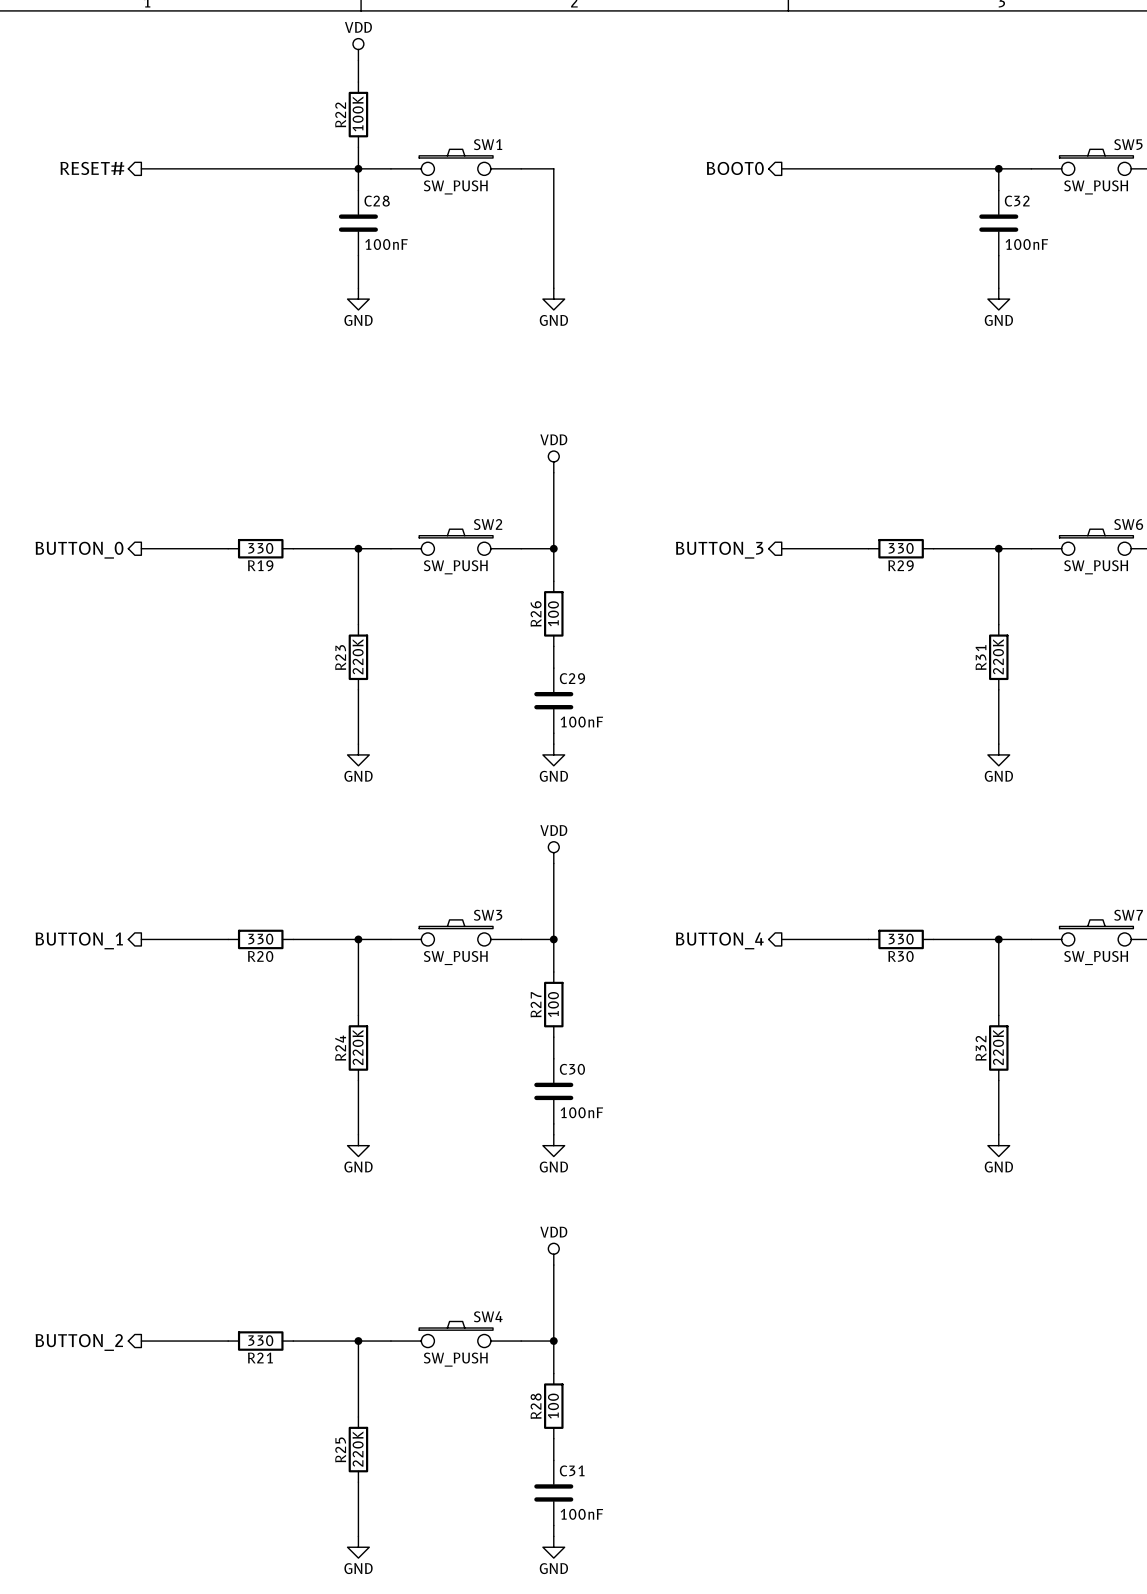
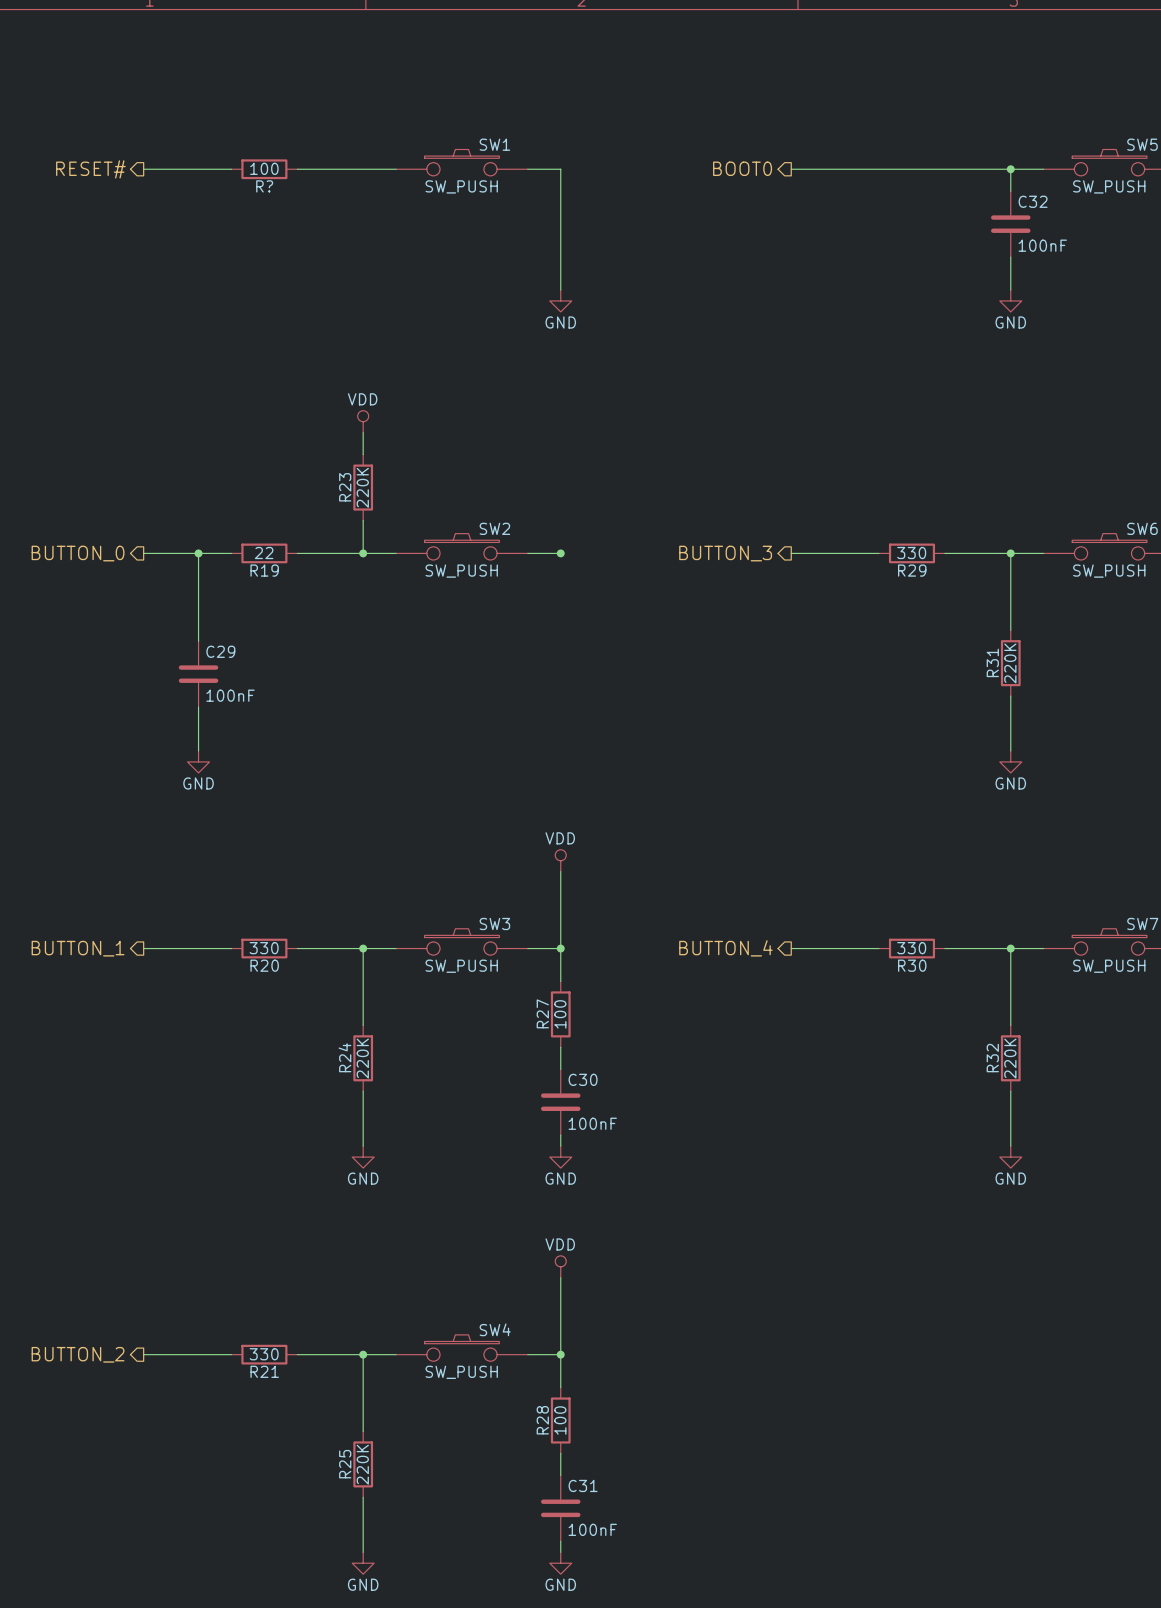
power symbol: VDD (358, 49) -> none
wire: (358, 60) (358, 82) -> none
R22: 100K (358, 114) -> none
wire: (358, 147) (358, 190) -> none
wire: (228, 168) (293, 168) -> none
R?: none -> 100 (264, 169)
junction: (358, 168) -> none
C28: 100nF (358, 223) -> none
wire: (358, 255) (358, 288) -> none
power symbol: GND (358, 299) -> none
power symbol: none -> VDD (363, 421)
wire: none -> (363, 432) (363, 454)
power symbol: VDD (553, 461) -> none
wire: (553, 472) (553, 581) -> none
wire: none -> (198, 553) (198, 641)
junction: none -> (198, 553)
R19 value: 330 (260, 548) -> 22 (264, 553)
wire: (358, 548) (358, 624) -> (363, 553) (363, 520)
R26: 100 (553, 613) -> none
wire: (553, 646) (553, 668) -> none
R23 position: (358, 657) -> (363, 487)
wire: (358, 689) (358, 744) -> none
wire: none -> (198, 707) (198, 750)
C29 position: (553, 700) -> (198, 674)
wire: (553, 733) (553, 744) -> none
power symbol position: GND (358, 754) -> GND (198, 761)
power symbol: GND (553, 754) -> none

